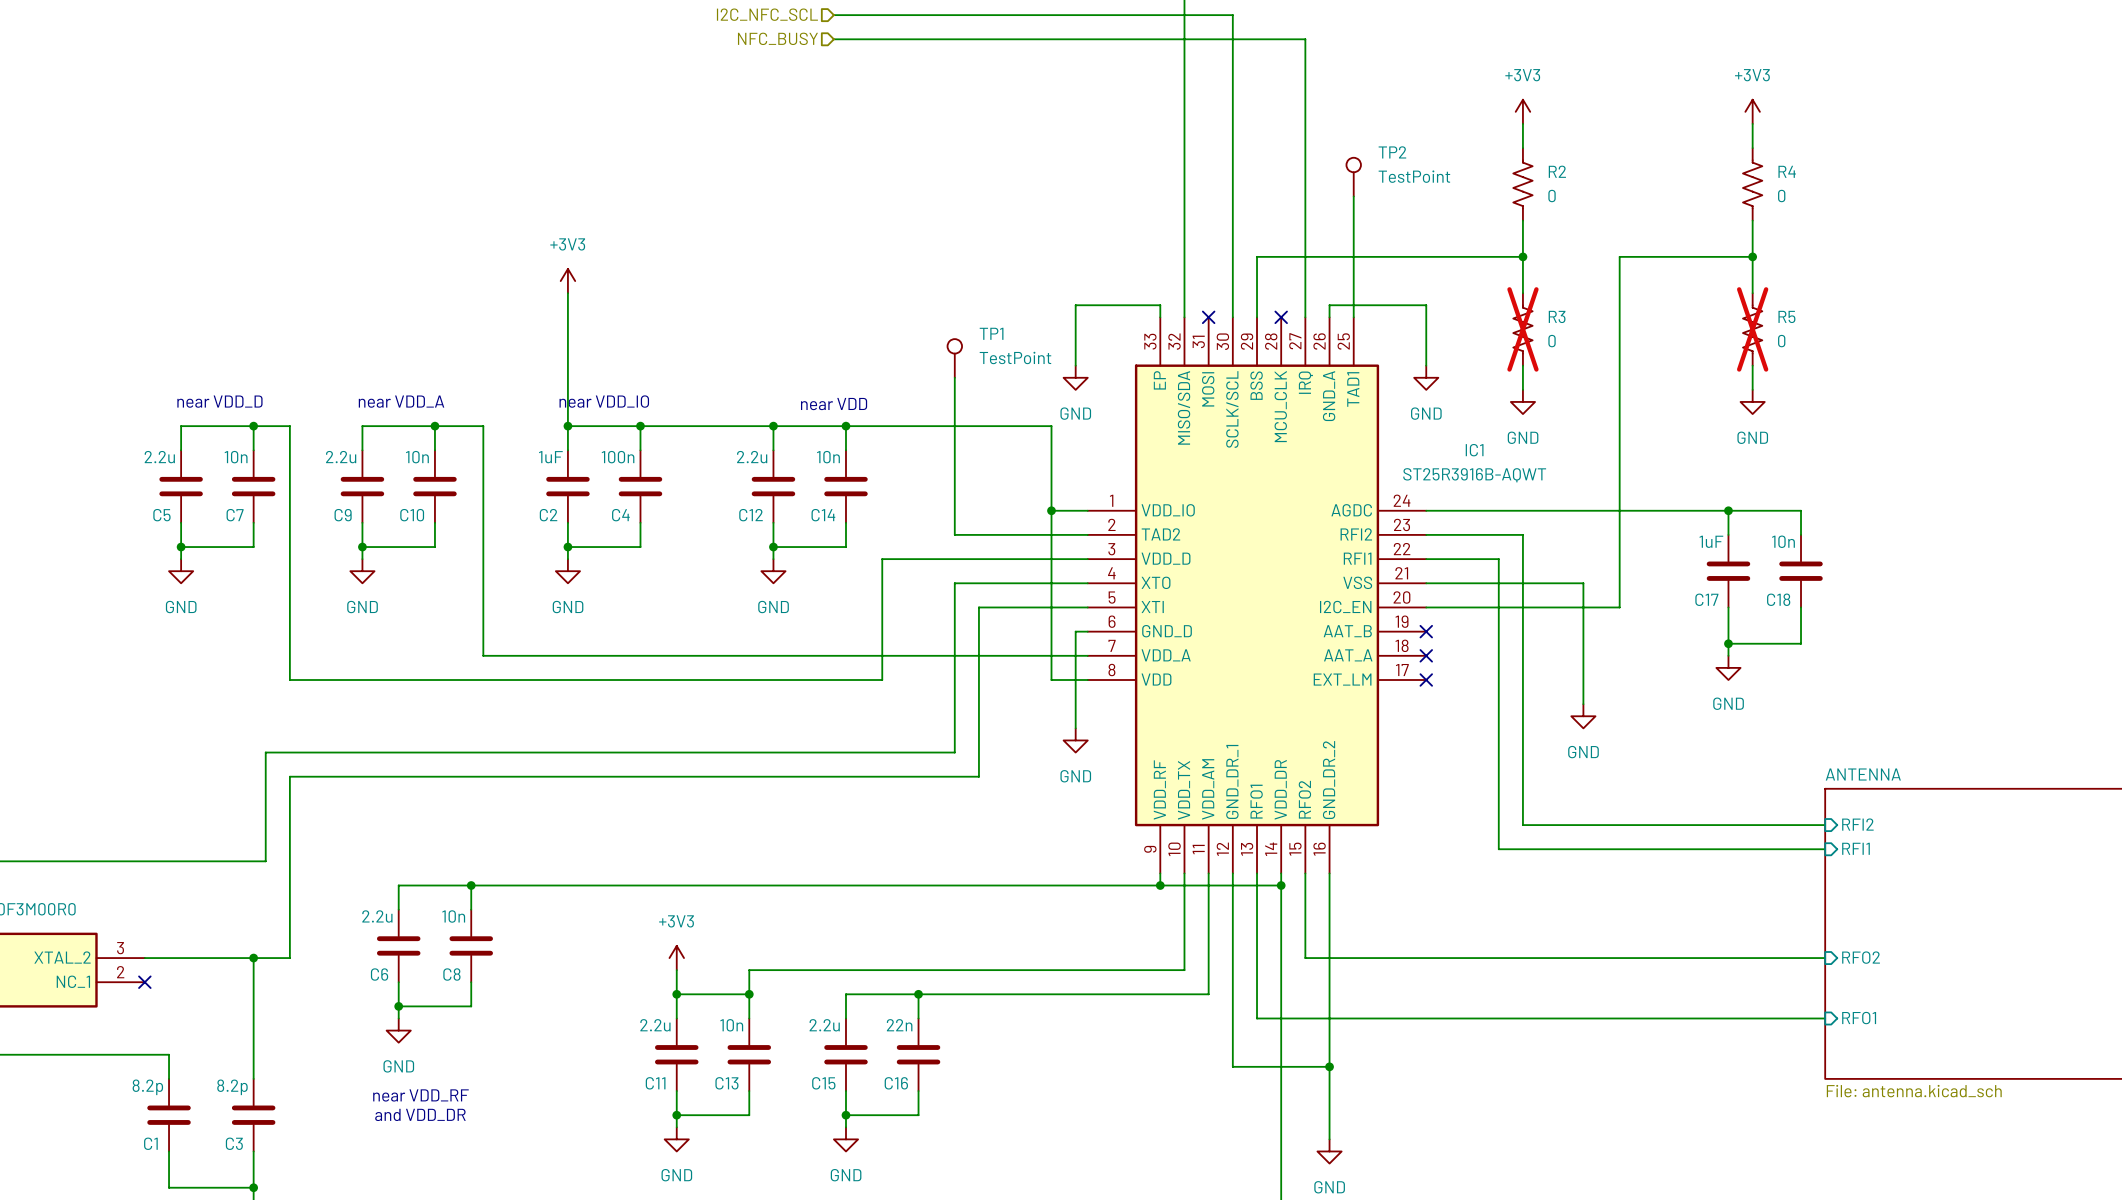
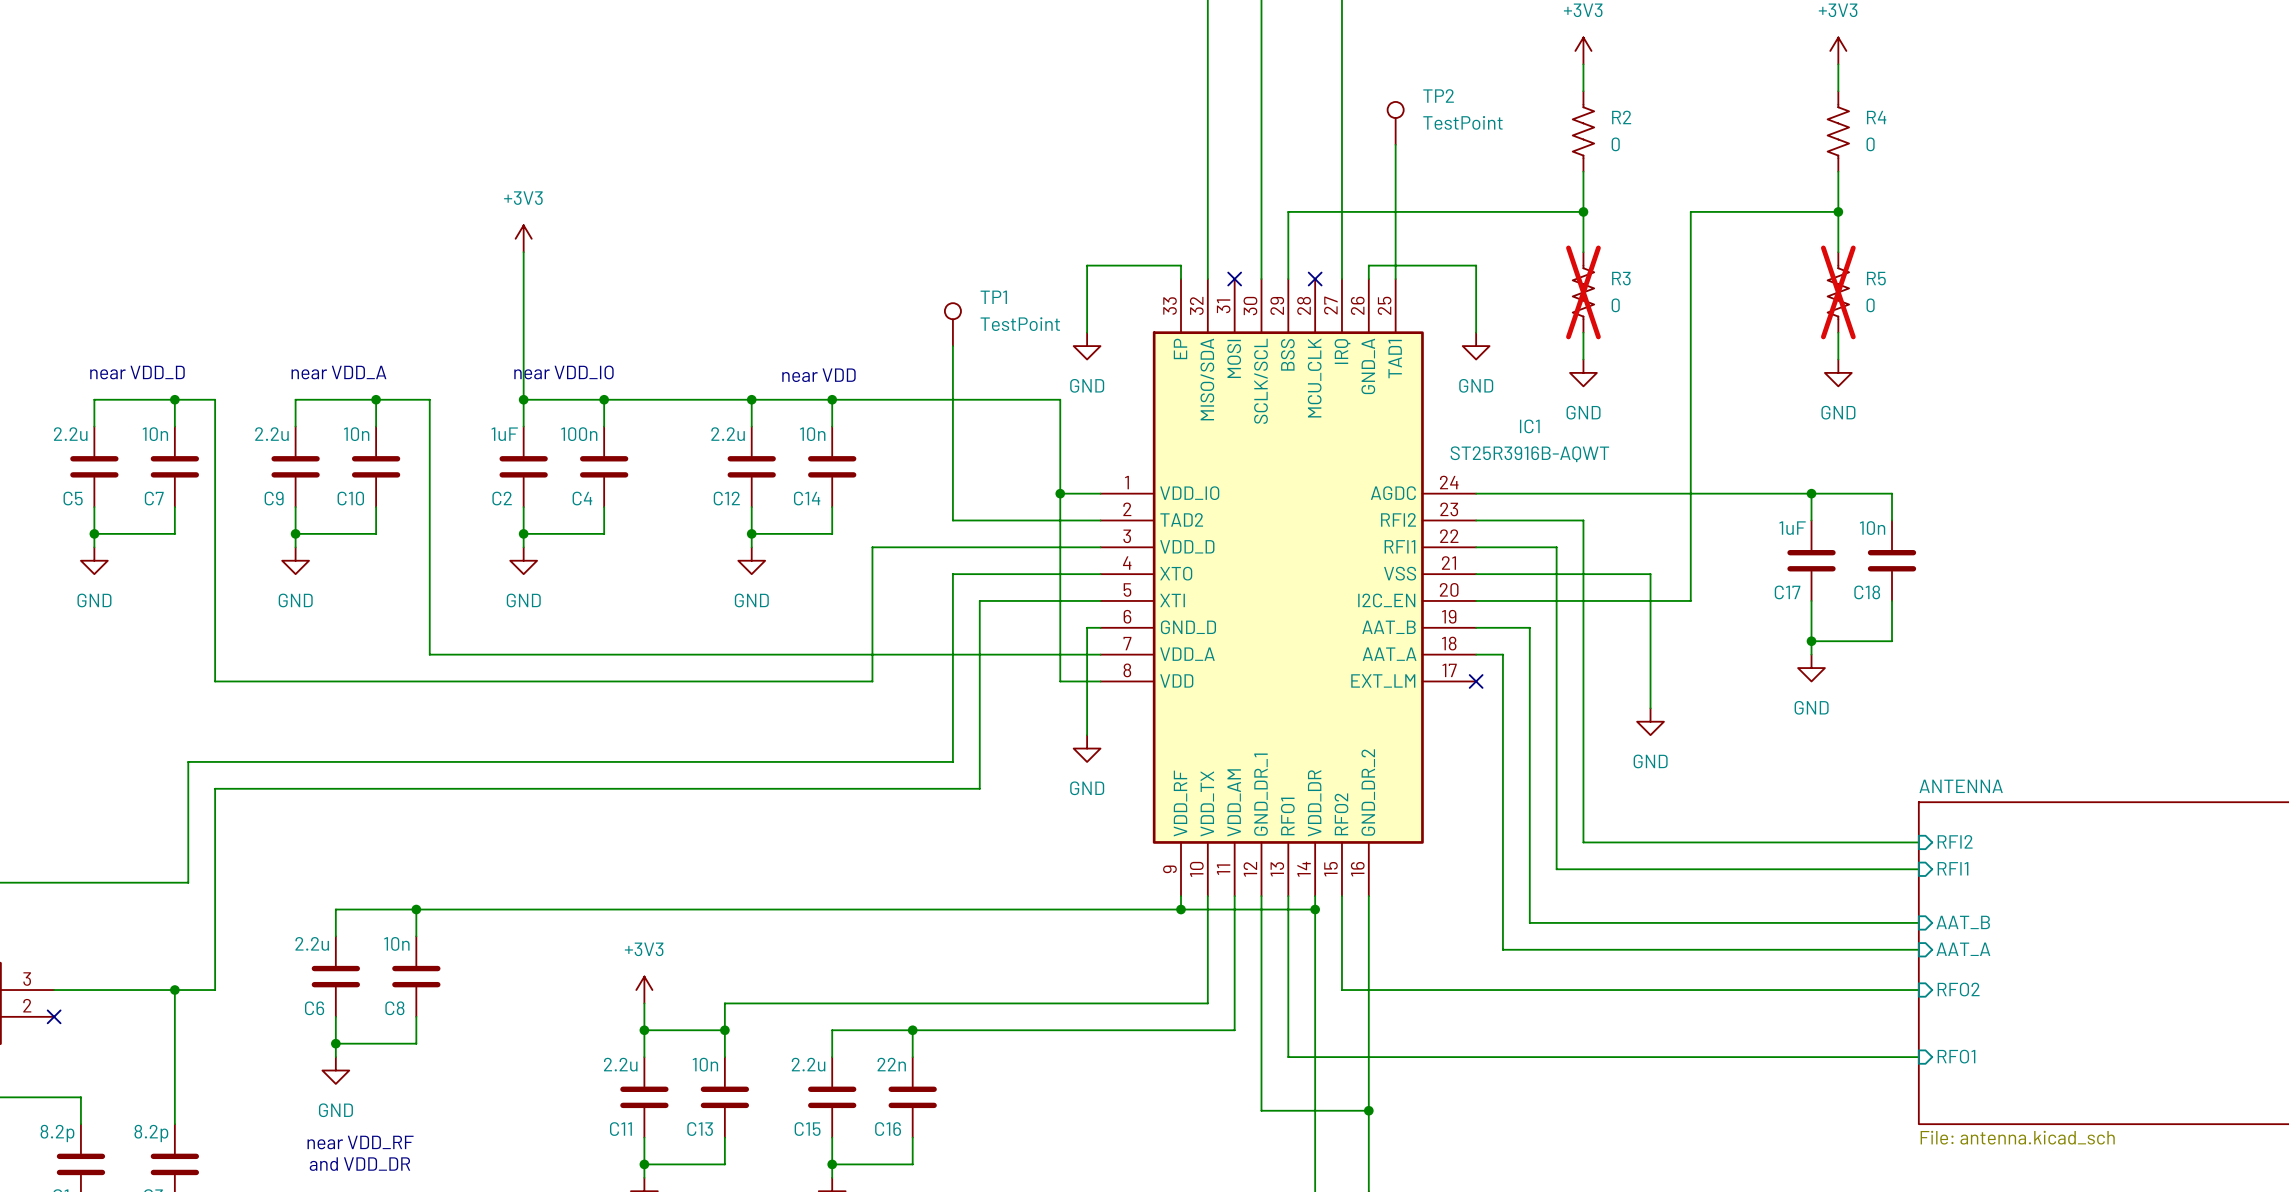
wire: none -> (1476, 627) (1529, 627) (1529, 922) (1918, 922)
no-connect mark: (1426, 631) -> none
wire: none -> (1476, 654) (1502, 654) (1502, 949) (1918, 949)
no-connect mark: (1426, 655) -> none
sheet pin: none -> AAT_B (1963, 922)
sheet pin: none -> AAT_A (1963, 949)

